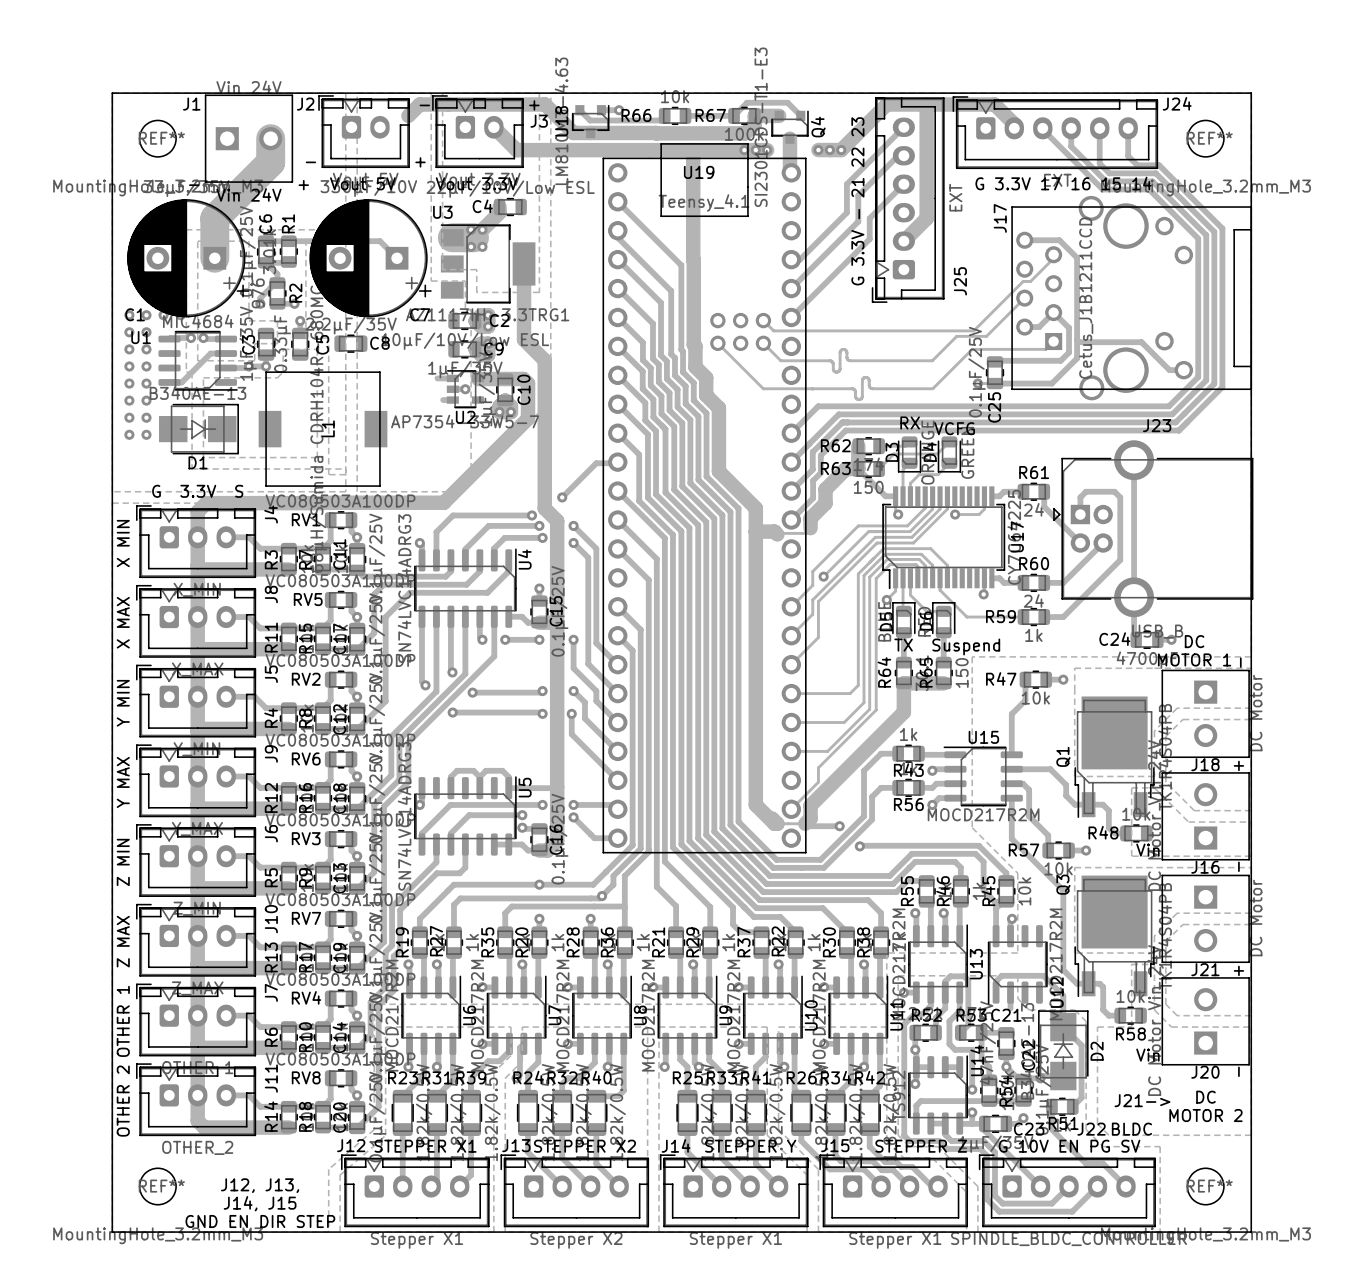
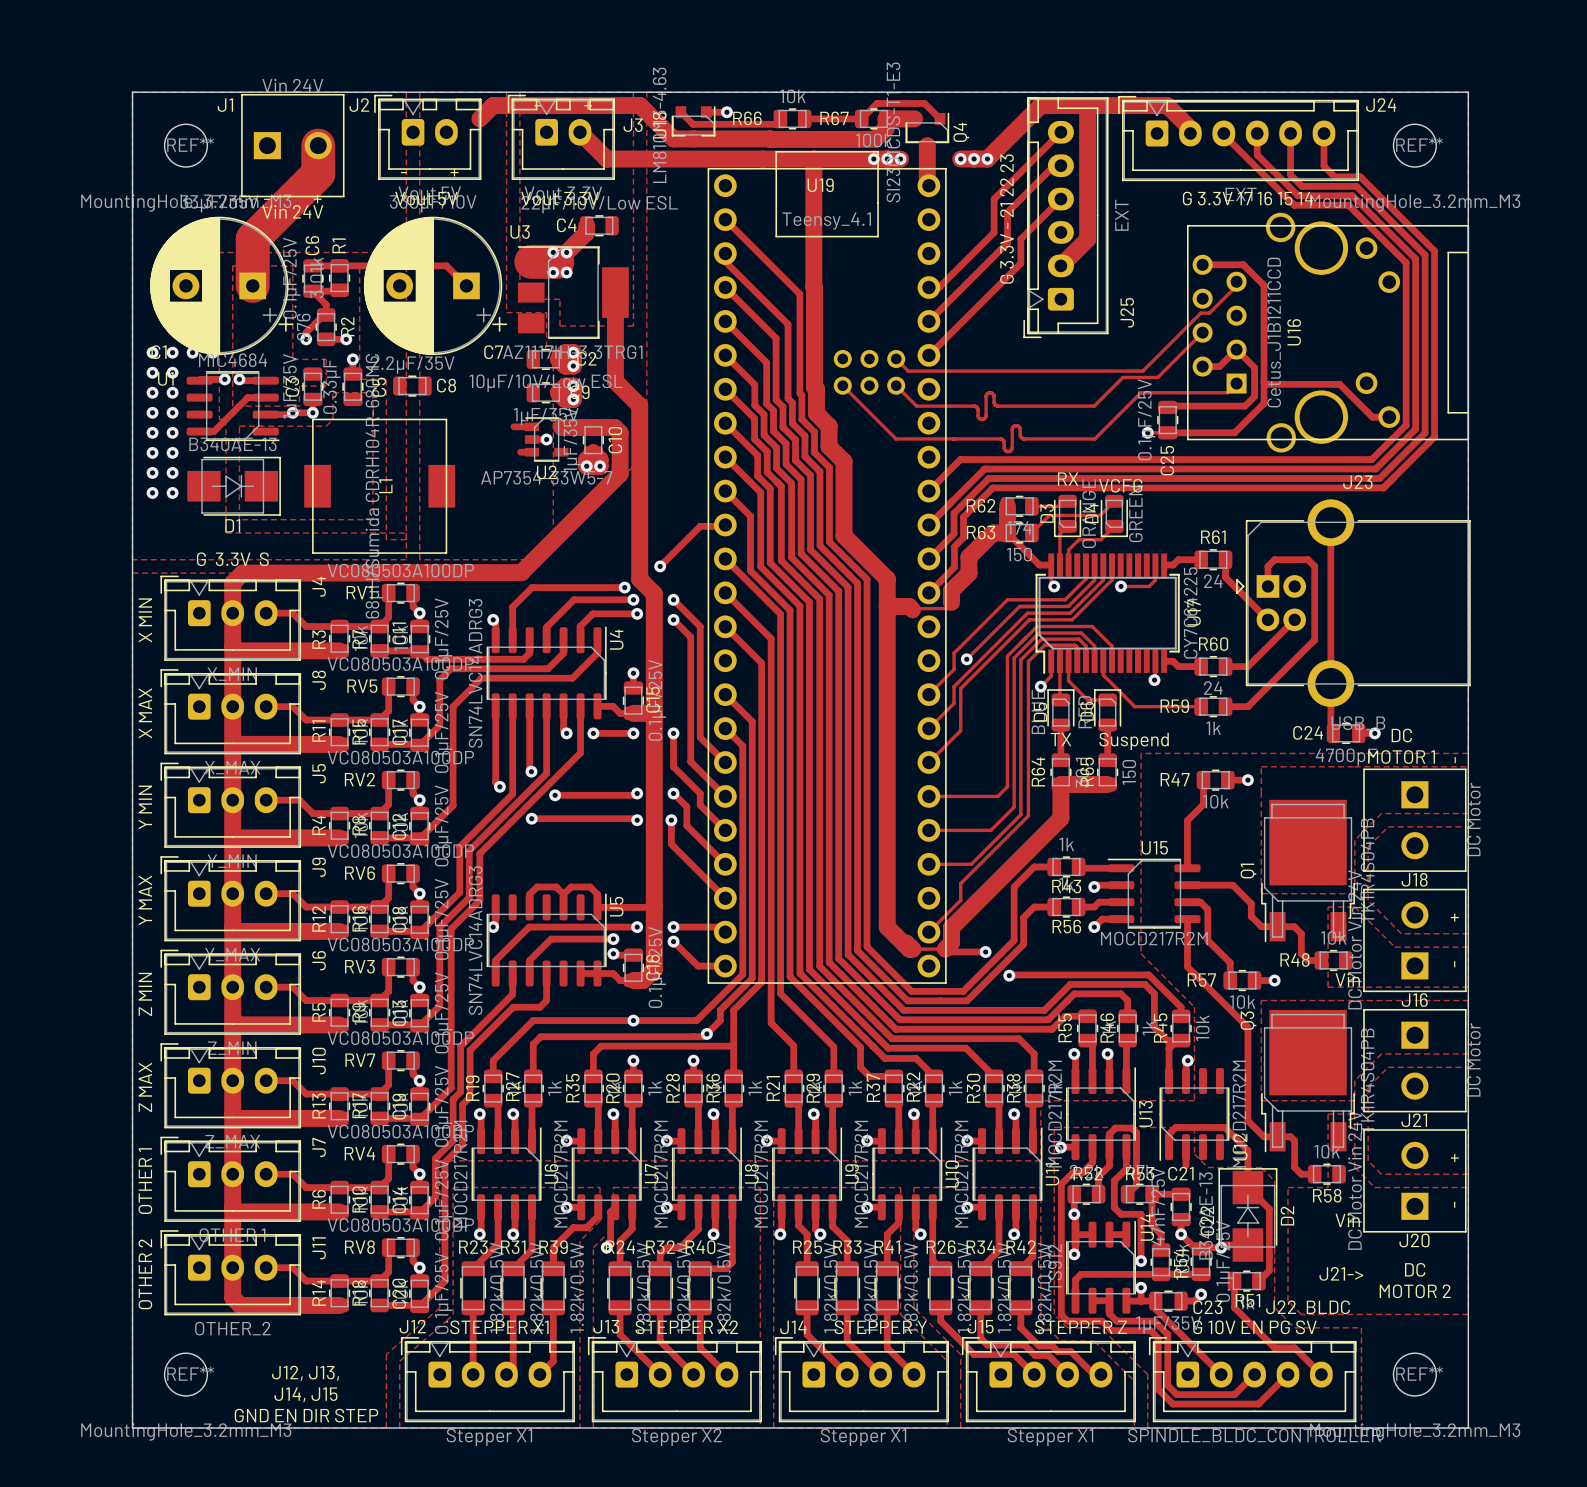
J17 name: J17 (1000, 218) -> U16 (1294, 332)

